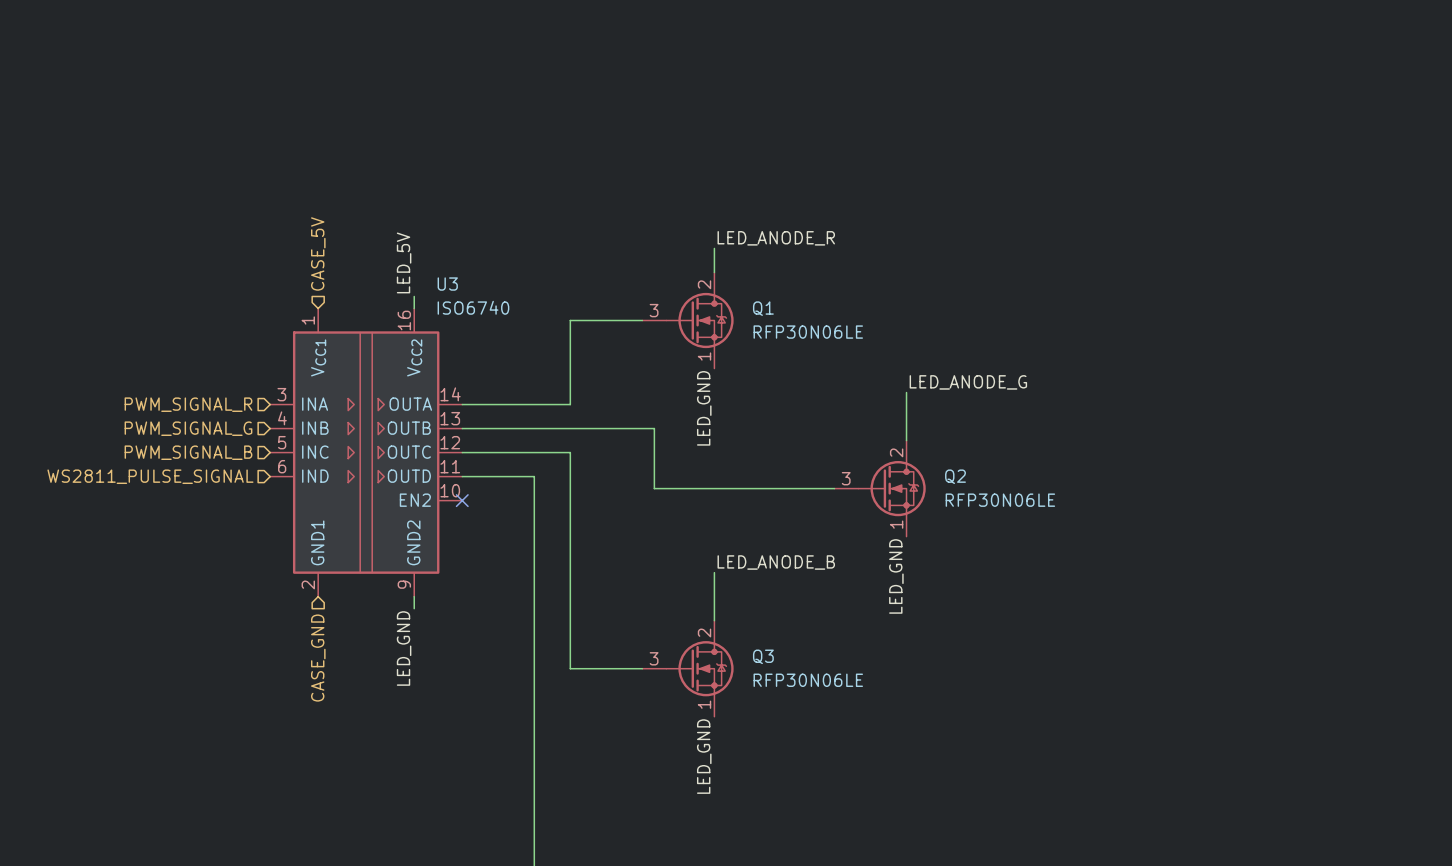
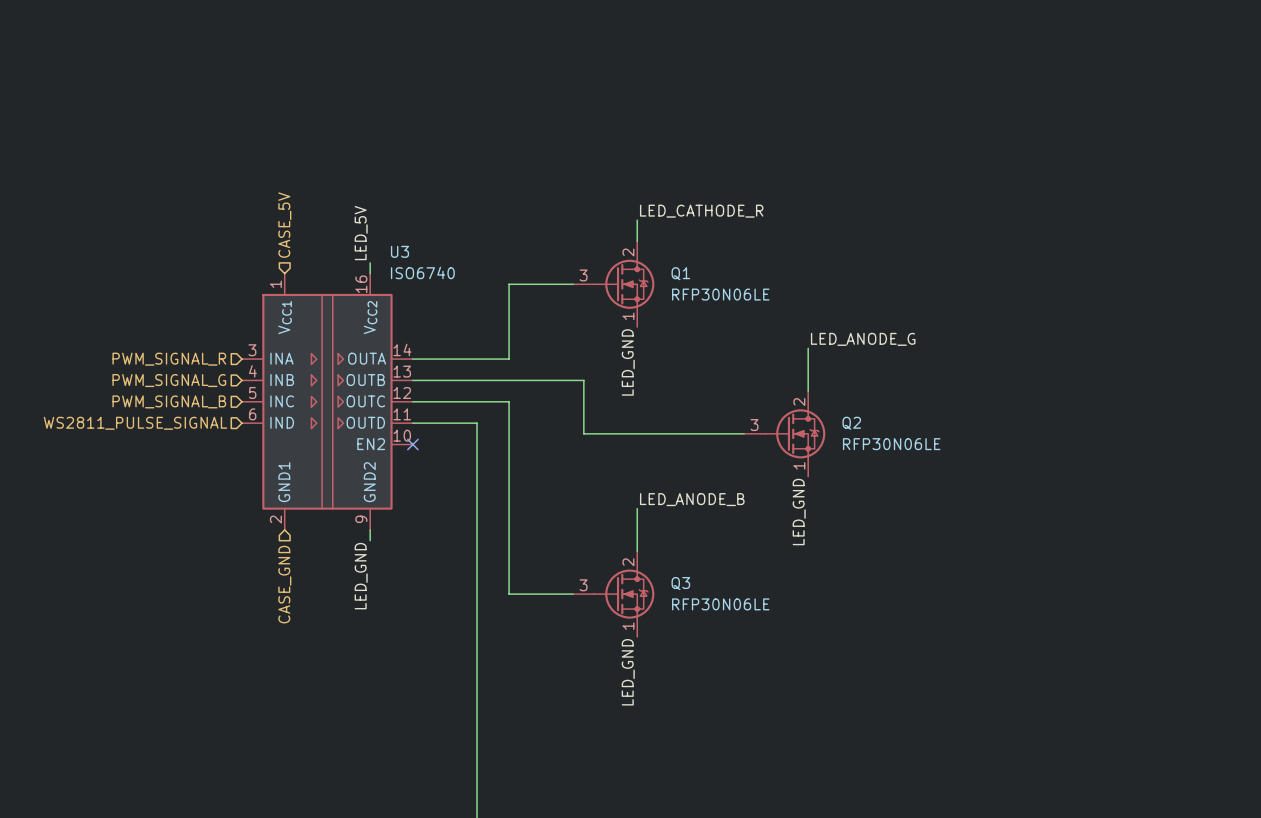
label: LED_ANODE_R (776, 238) -> LED_CATHODE_R (701, 211)

